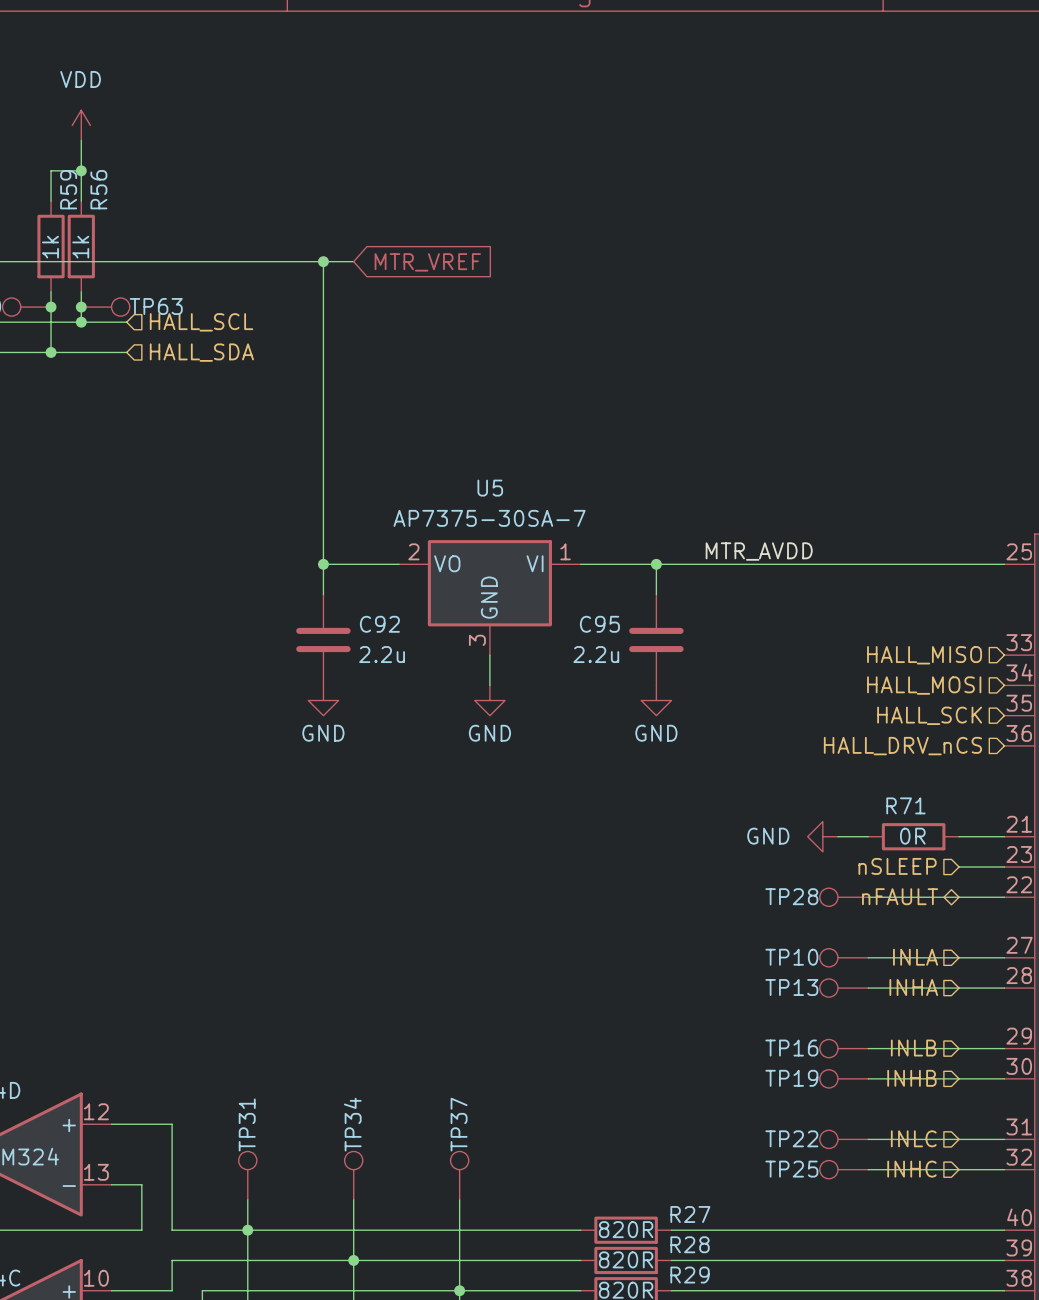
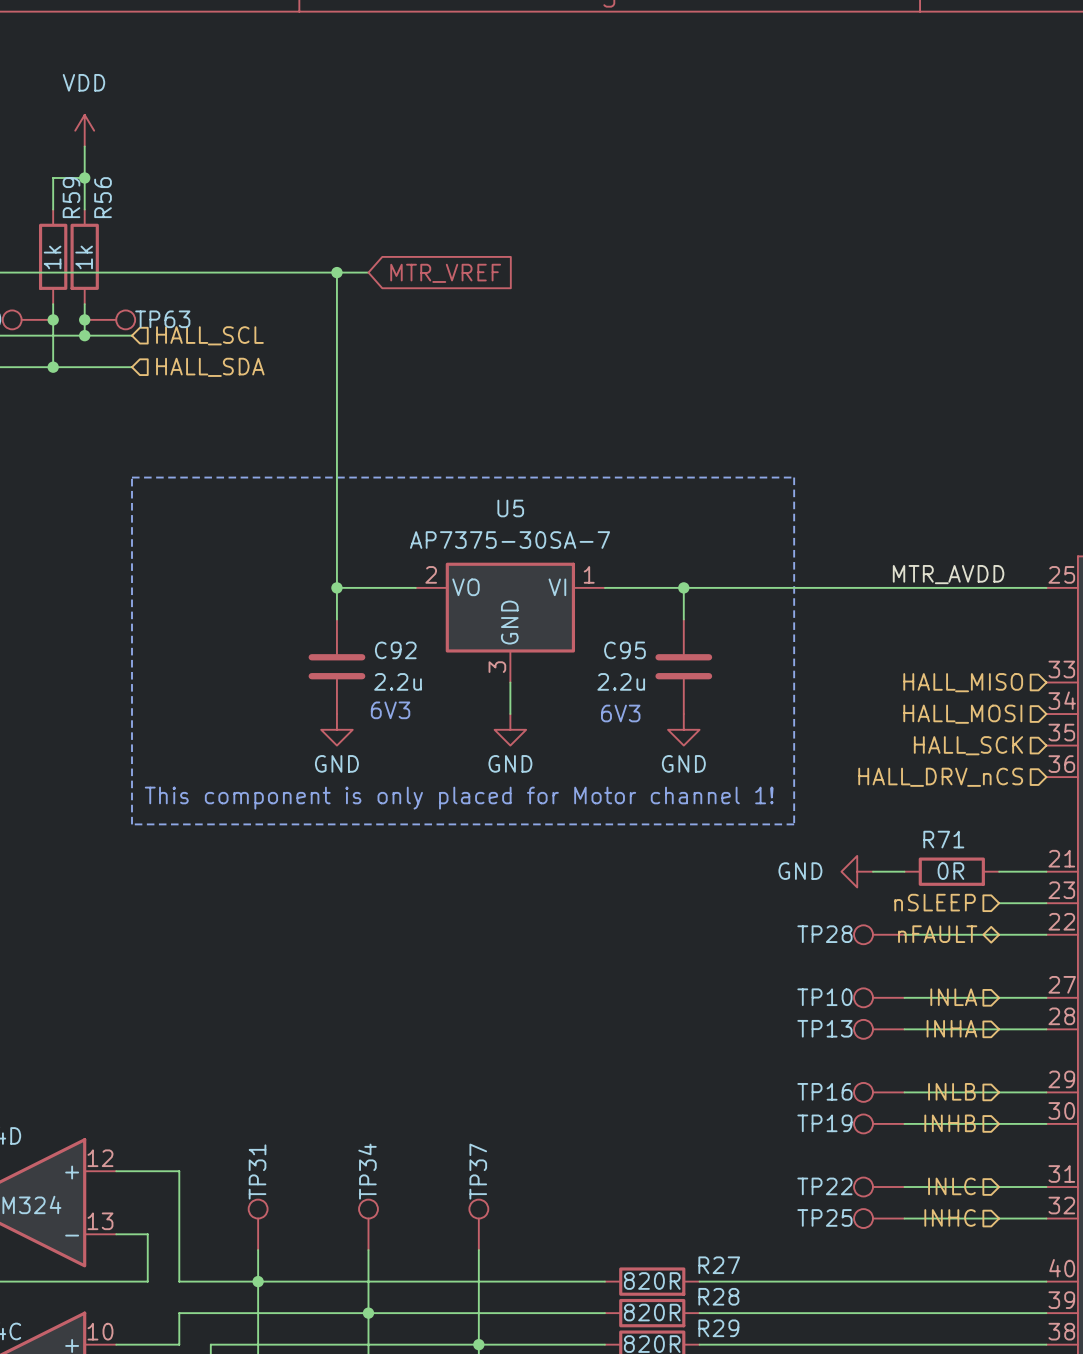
line: none -> (132, 477) (794, 477) (794, 824) (132, 824) (132, 477)
label position: MTR_AVDD (759, 551) -> MTR_AVDD (948, 574)
text: none -> 6V3 (390, 710)
text: none -> 6V3 (620, 713)
text: none -> This component is only placed for Motor channel 1! (459, 798)

